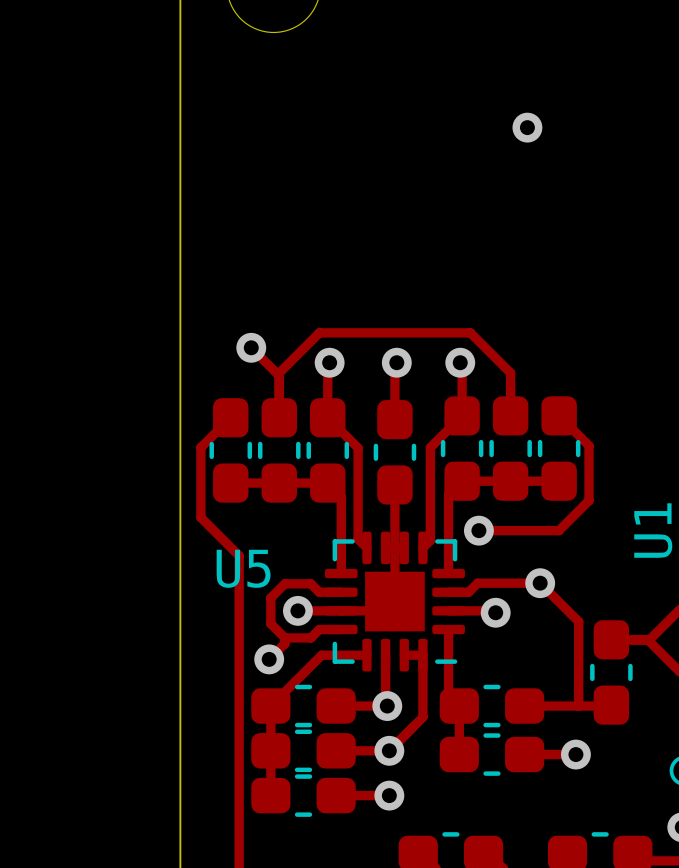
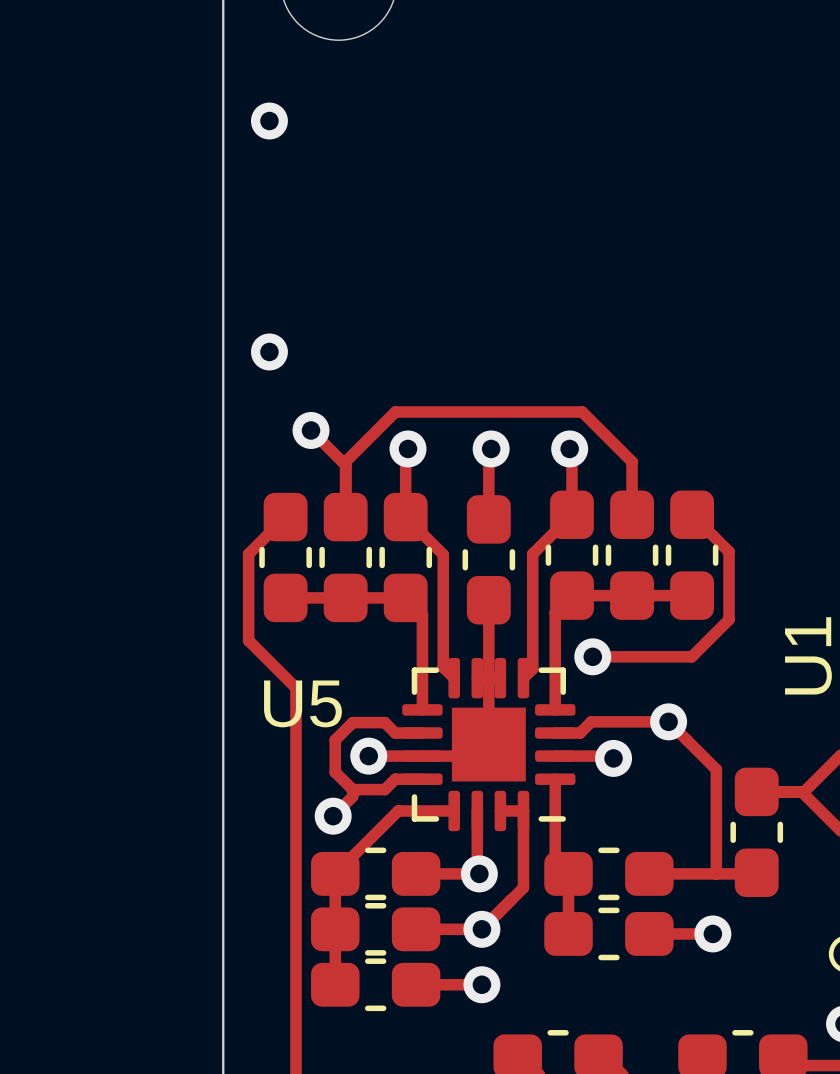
via: none -> (269, 121)
via: (527, 127) -> none
via: none -> (269, 351)

